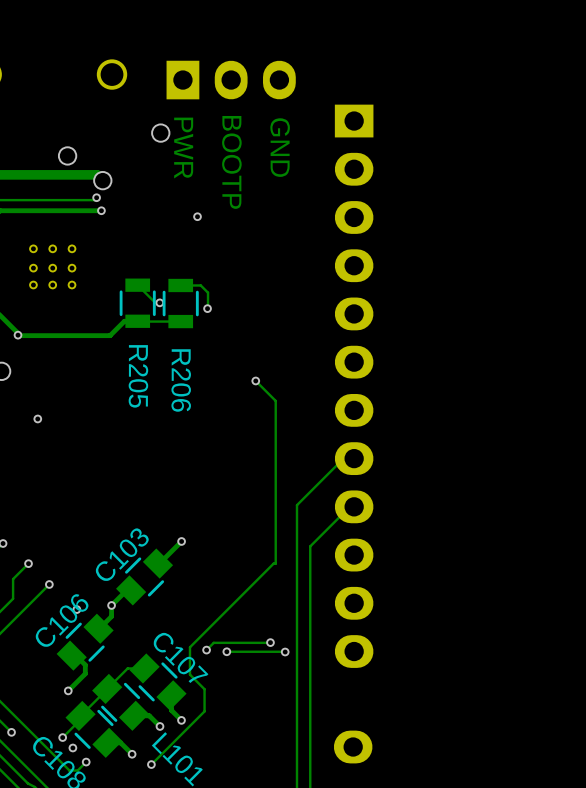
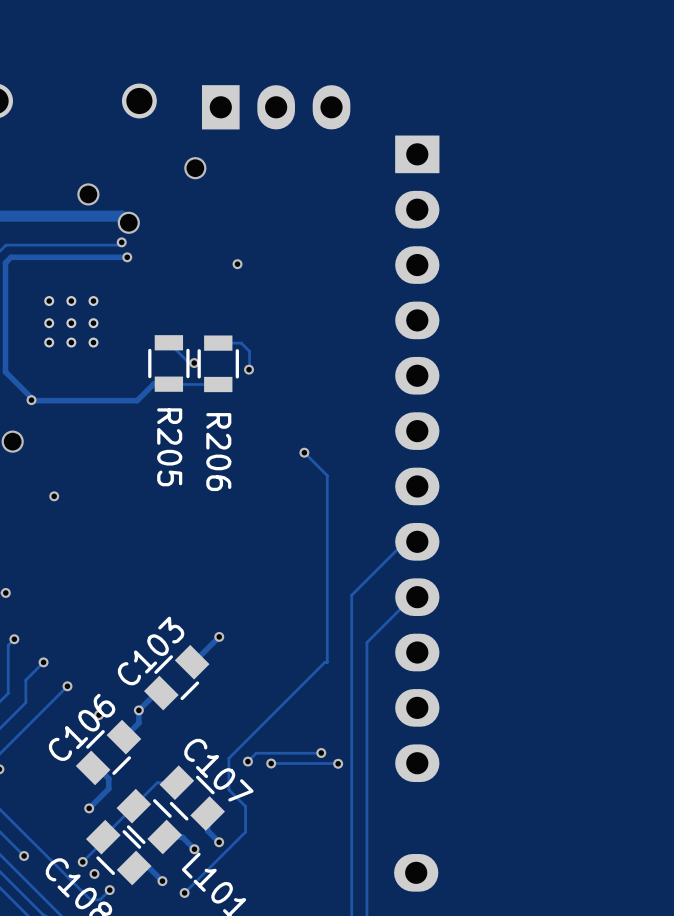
text: GND (280, 147) -> none
text: PWR (183, 148) -> none
text: BOOTP (231, 162) -> none

